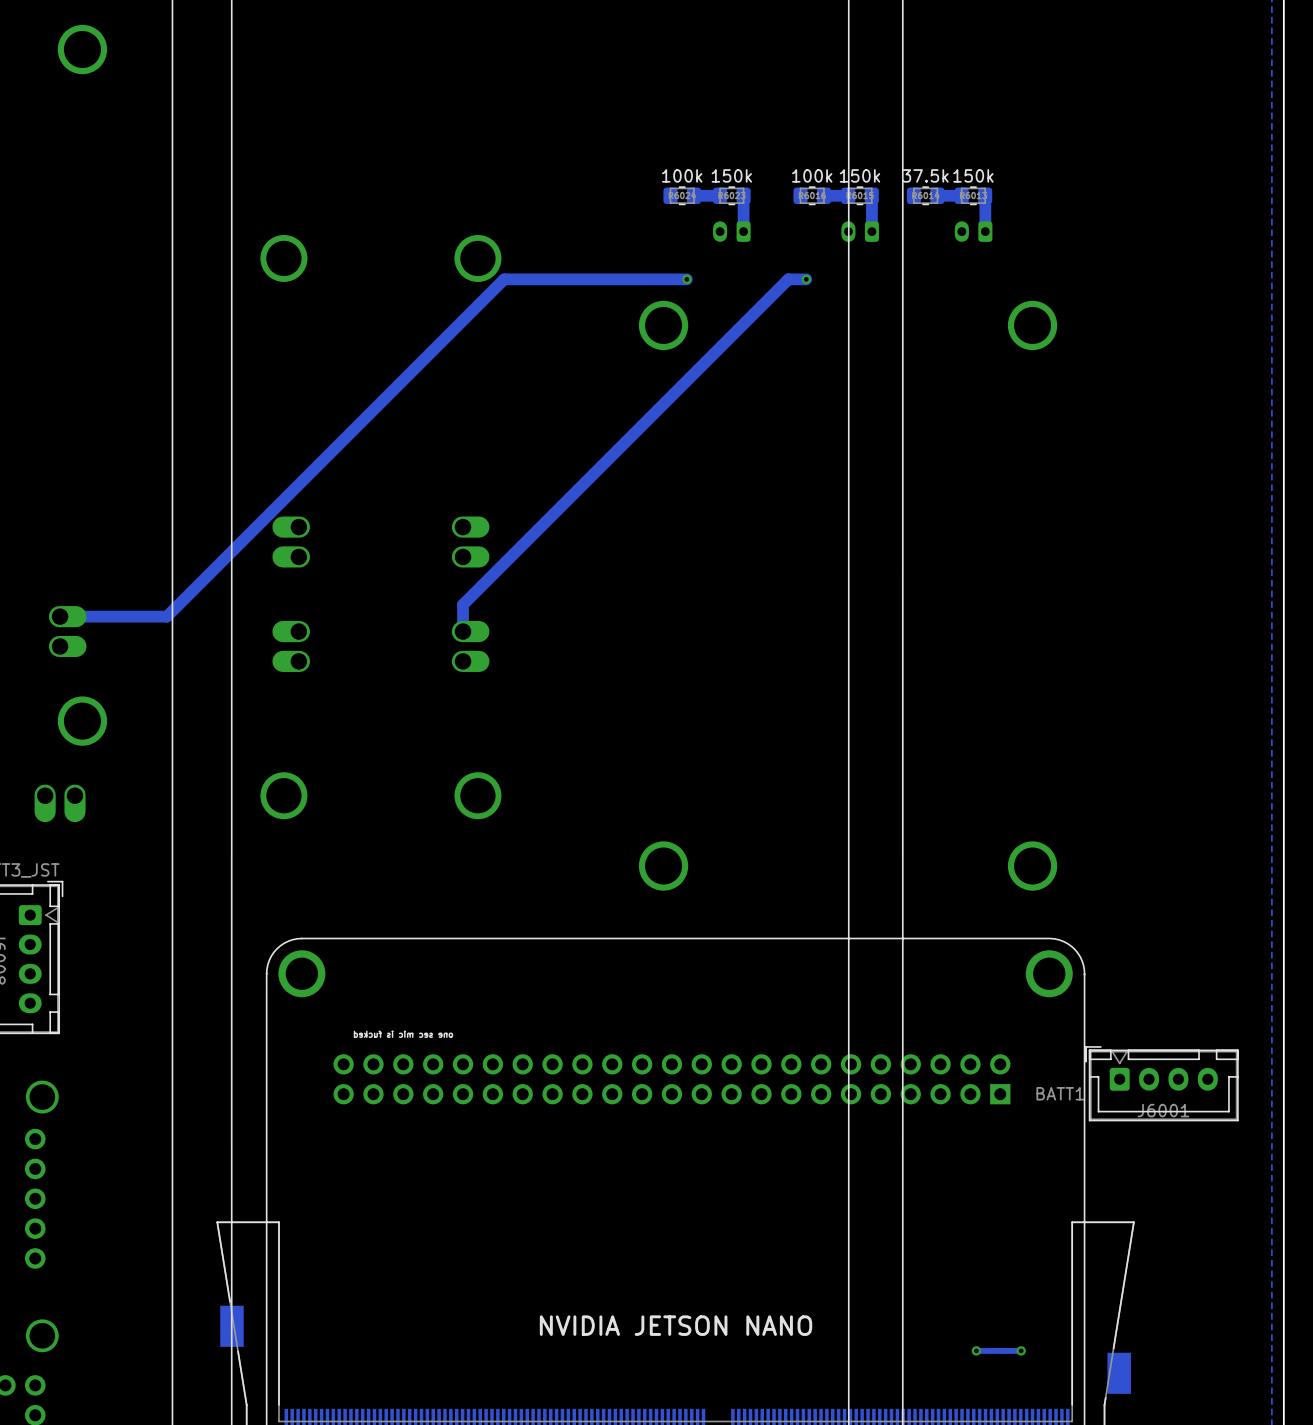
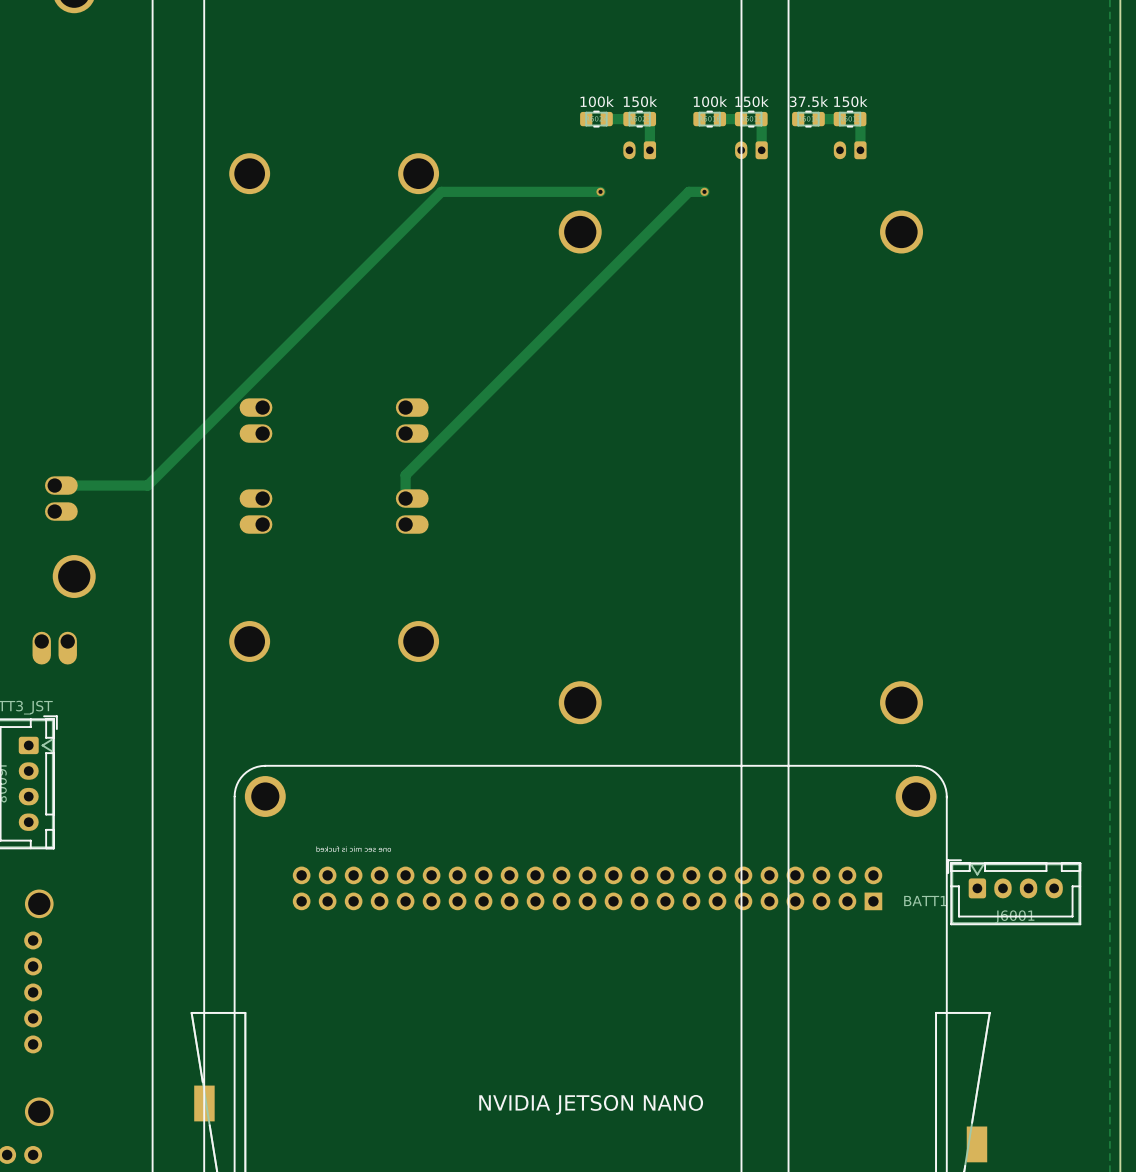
via: (976, 1350) -> none
track: (1021, 1350) (976, 1350) -> none
via: (1021, 1350) -> none

